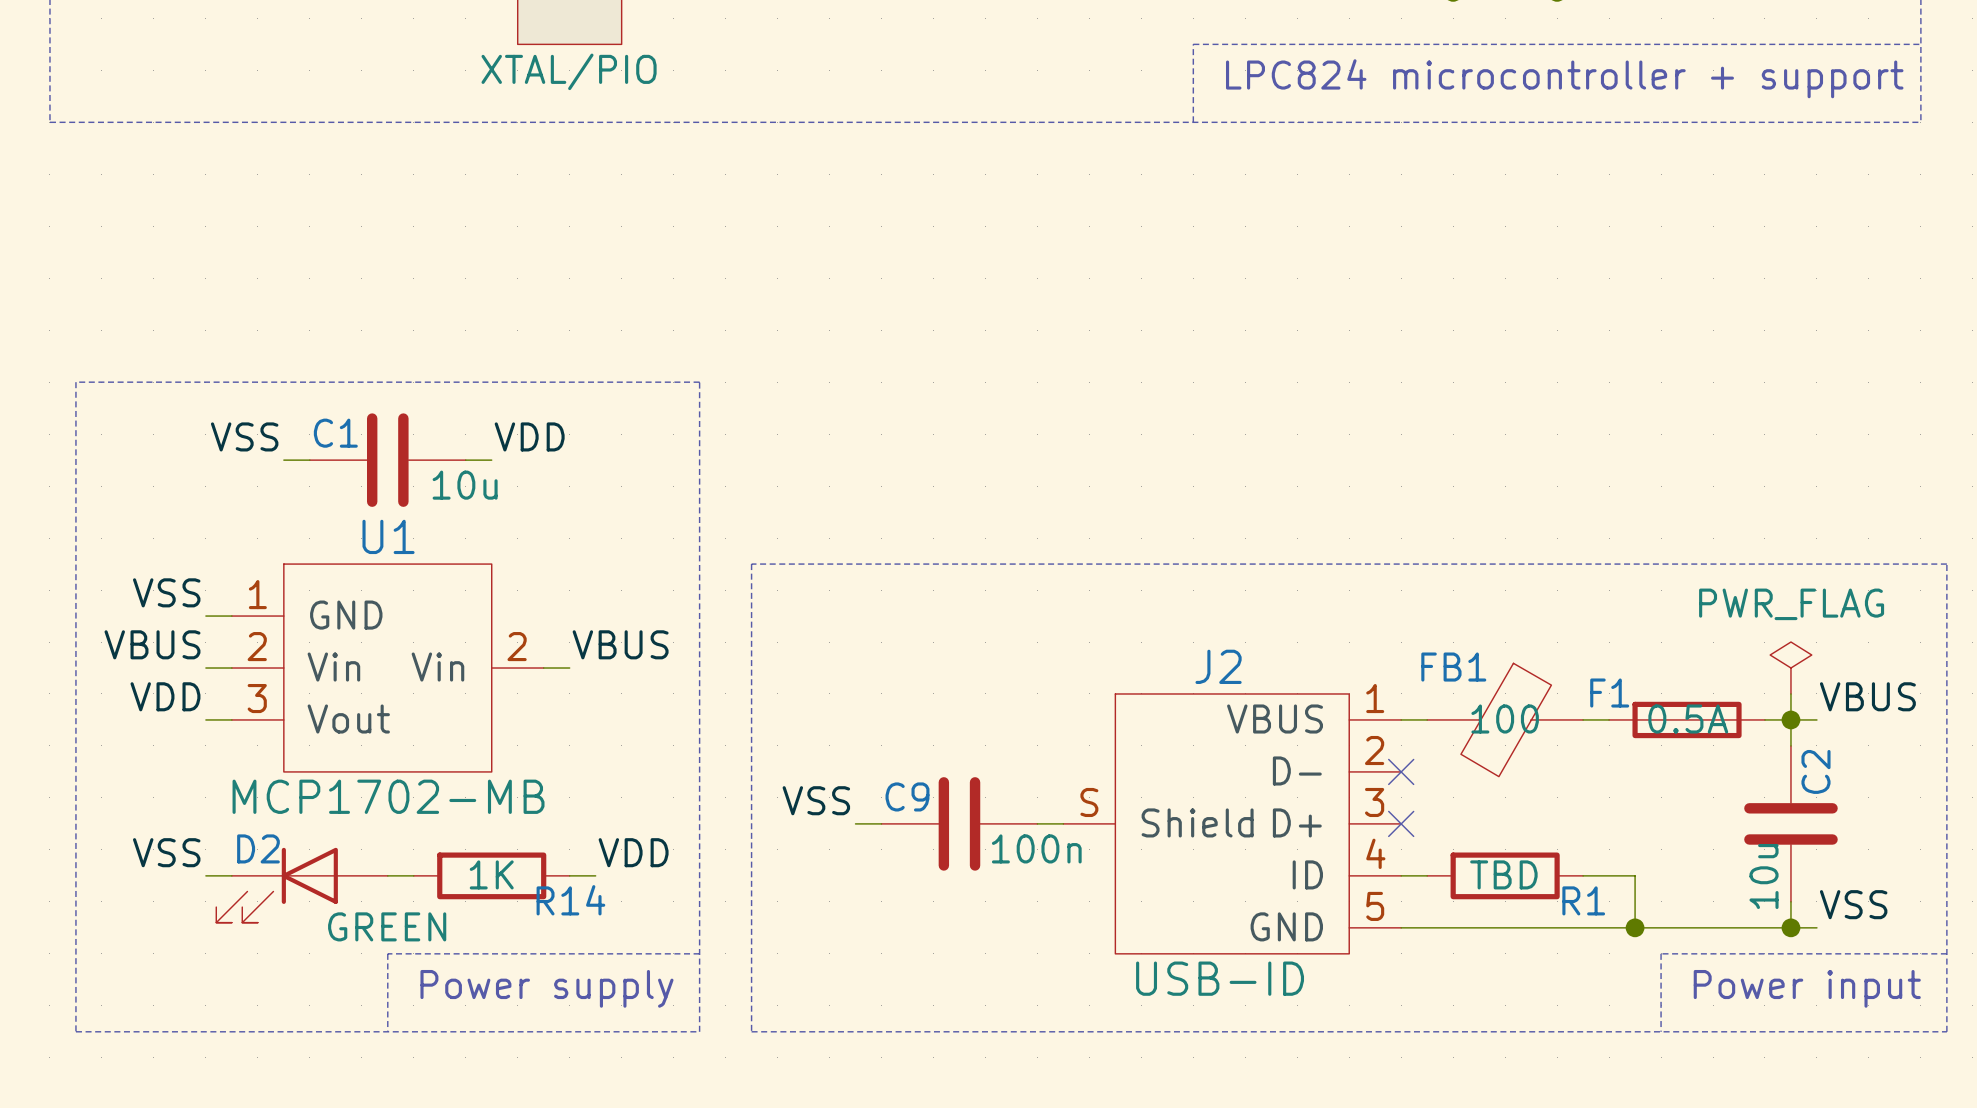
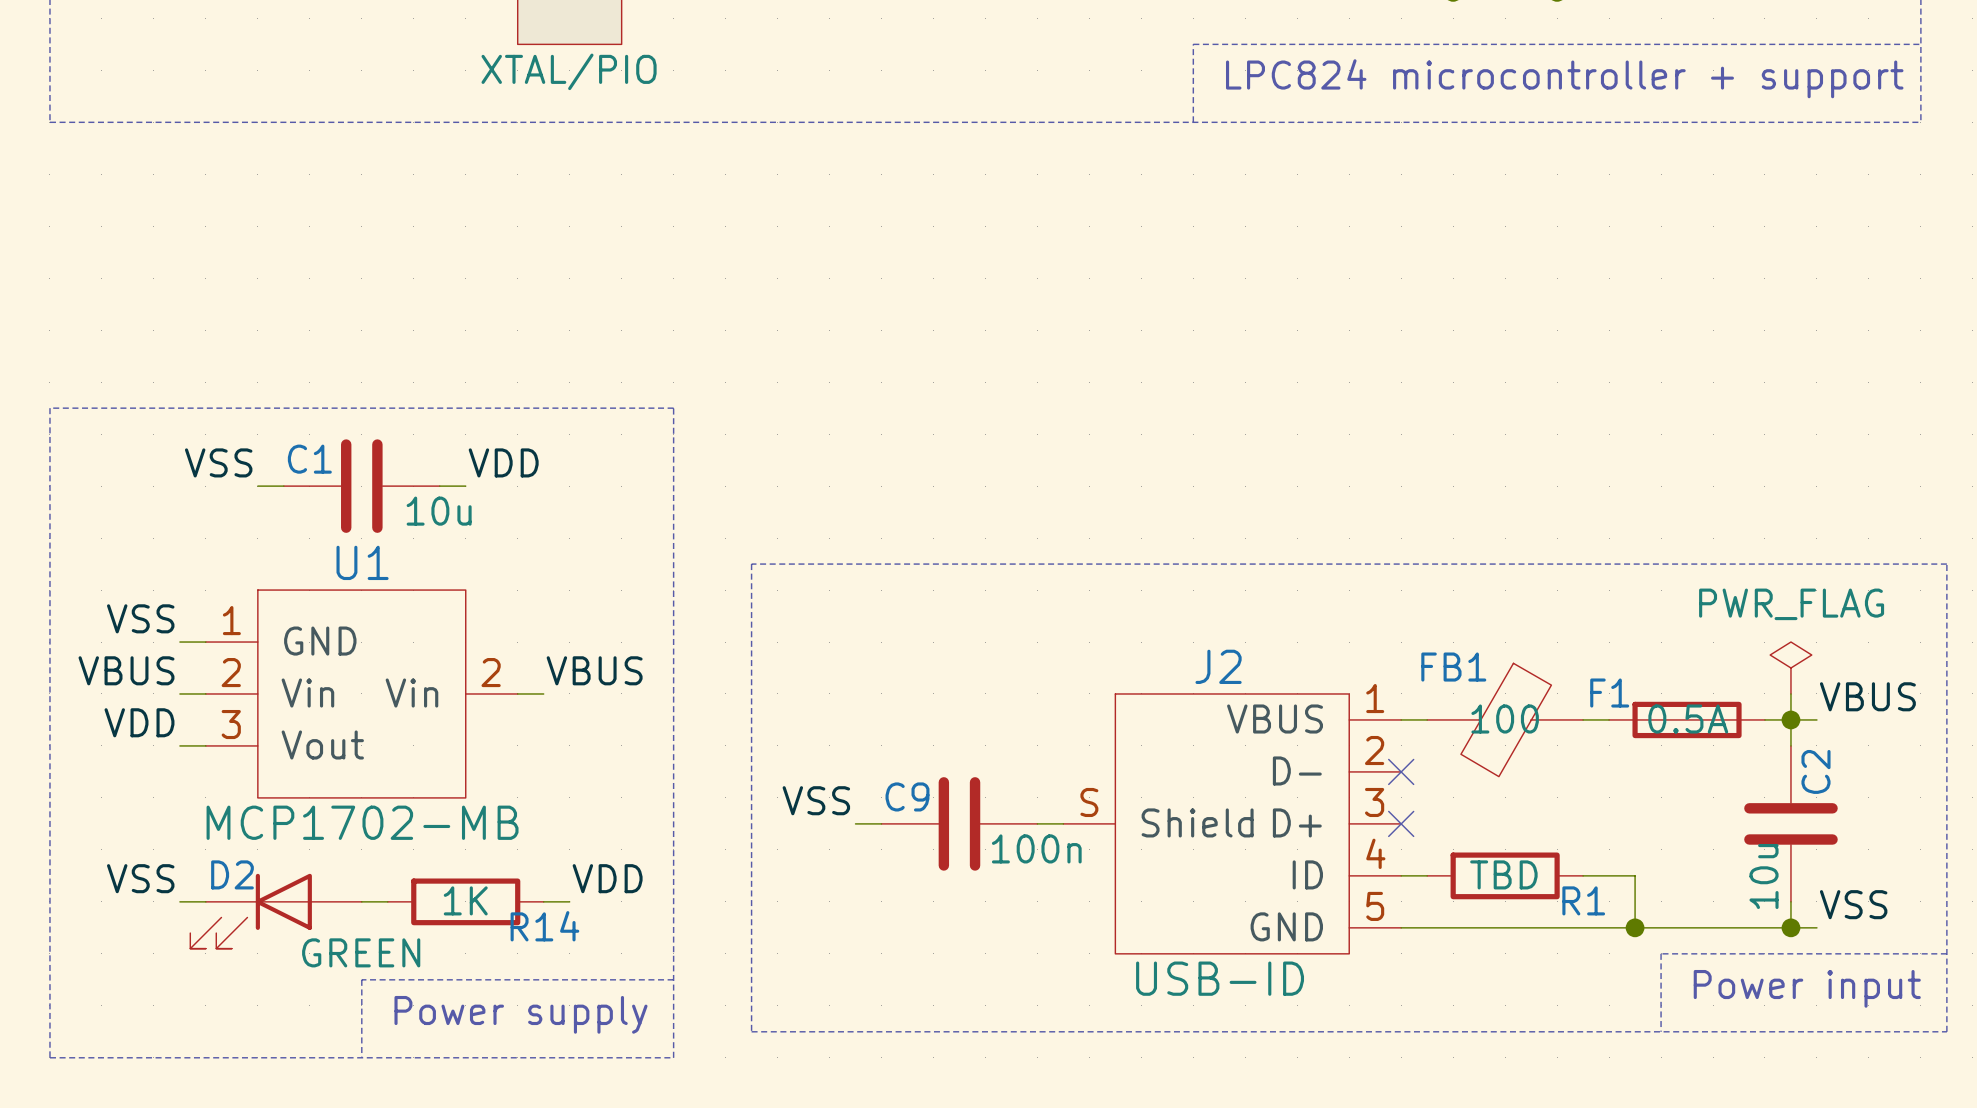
line: (75, 382) (699, 382) (699, 1031) (75, 1031) (75, 382) -> (49, 408) (673, 408) (673, 1057) (49, 1057) (49, 408)
label position: VSS (244, 436) -> VSS (218, 462)
label position: VDD (529, 436) -> VDD (503, 462)
wire: (283, 460) (309, 460) -> (257, 486) (283, 486)
C1 position: (387, 460) -> (361, 486)
wire: (465, 460) (491, 460) -> (439, 486) (465, 486)
label position: VSS (166, 592) -> VSS (140, 618)
wire: (205, 616) (231, 616) -> (179, 642) (205, 642)
label position: VBUS (152, 644) -> VBUS (126, 670)
label position: VBUS (620, 644) -> VBUS (594, 670)
wire: (205, 668) (231, 668) -> (179, 693) (205, 693)
U1 position: (387, 668) -> (361, 693)
wire: (543, 668) (569, 668) -> (517, 693) (543, 693)
label position: VDD (165, 696) -> VDD (139, 722)
wire: (205, 719) (231, 719) -> (179, 745) (205, 745)
label position: VSS (166, 852) -> VSS (140, 878)
label position: VDD (633, 852) -> VDD (607, 878)
wire: (205, 875) (231, 875) -> (179, 901) (205, 901)
wire: (387, 875) (413, 875) -> (361, 901) (387, 901)
R14 position: (491, 875) -> (465, 901)
wire: (569, 875) (595, 875) -> (543, 901) (569, 901)
D2 position: (302, 885) -> (276, 911)
line: (699, 953) (387, 953) (387, 1031) -> (673, 979) (361, 979) (361, 1057)
text position: Power supply (546, 988) -> Power supply (521, 1014)

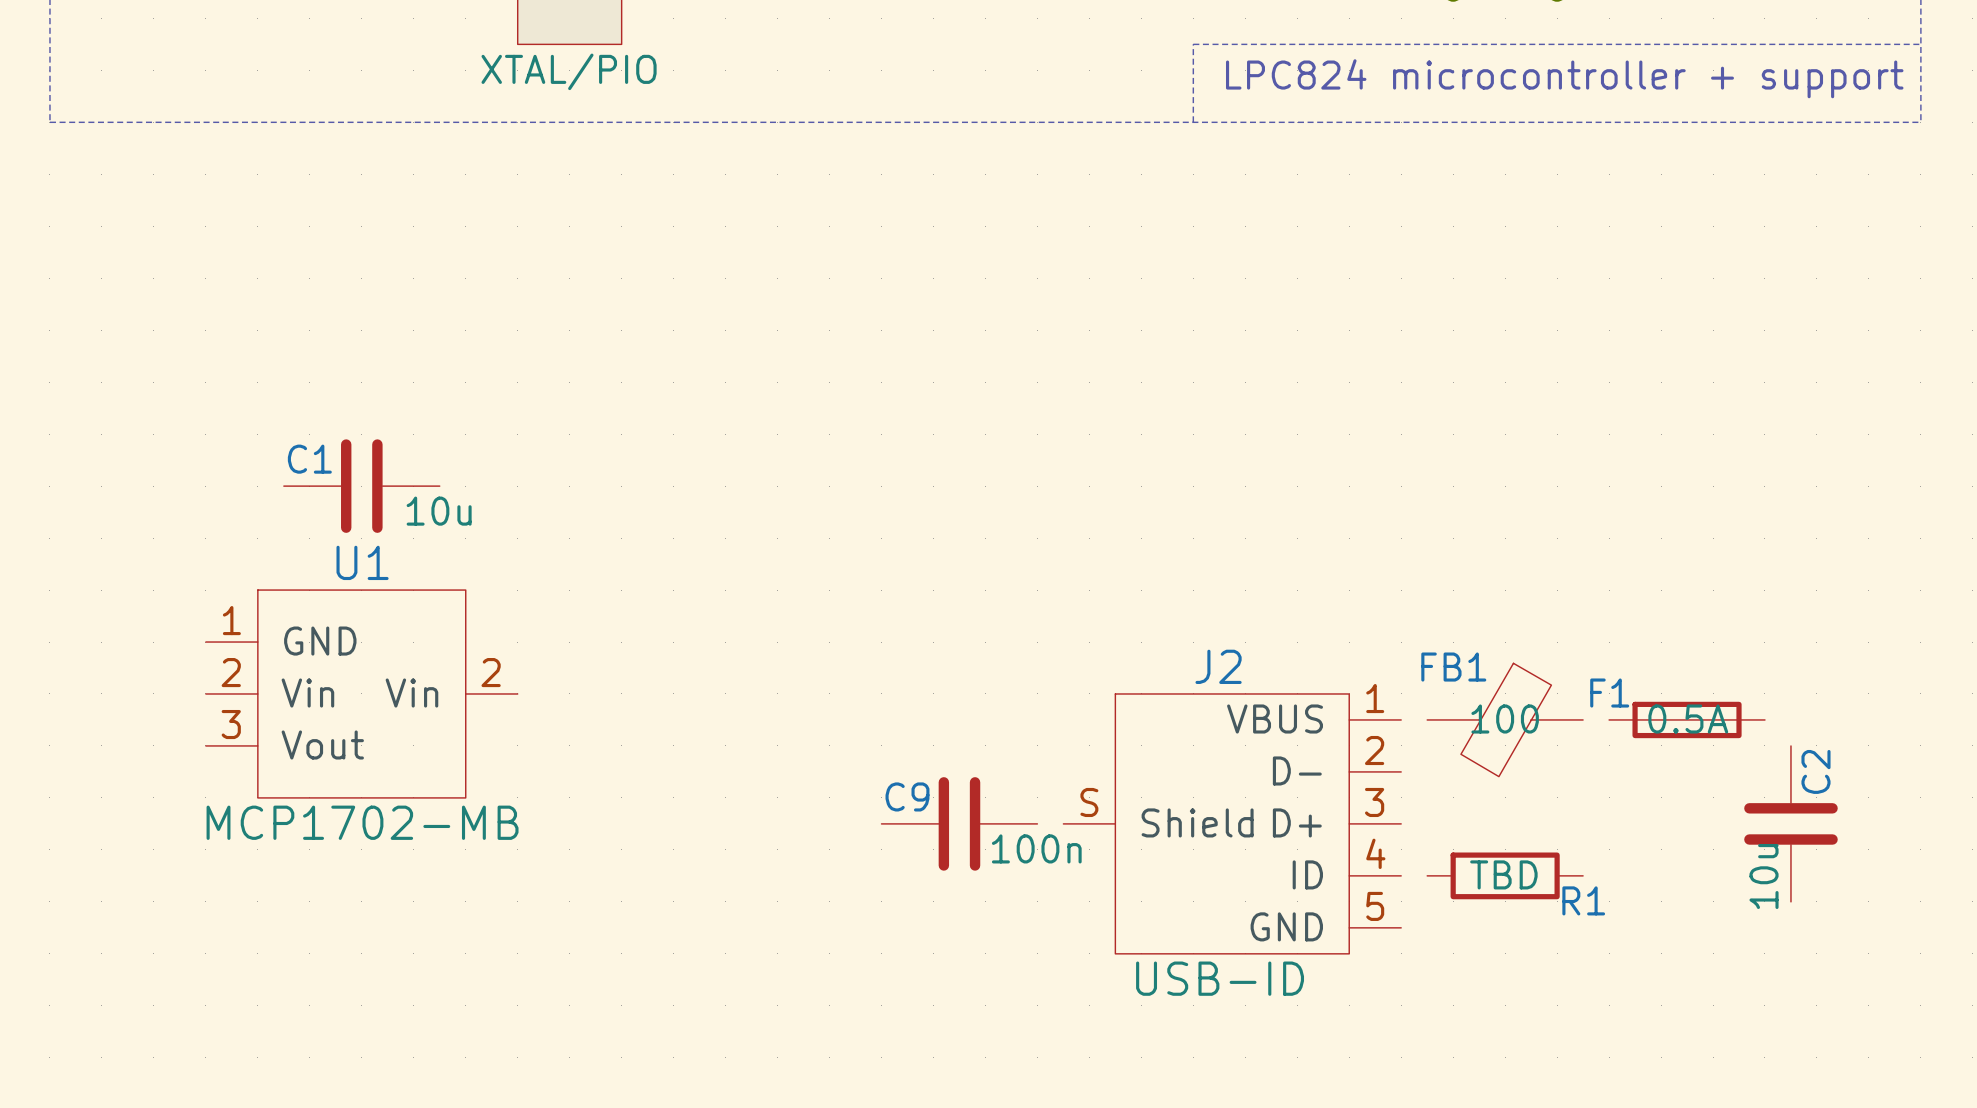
line: (49, 408) (673, 408) (673, 1057) (49, 1057) (49, 408) -> none
label: VSS (218, 462) -> none
label: VDD (503, 462) -> none
wire: (257, 486) (283, 486) -> none
wire: (439, 486) (465, 486) -> none
line: (751, 564) (1946, 564) (1946, 1031) (751, 1031) (751, 564) -> none
label: VSS (140, 618) -> none
wire: (179, 642) (205, 642) -> none
power symbol: PWR_FLAG (1790, 668) -> none
label: VBUS (126, 670) -> none
label: VBUS (594, 670) -> none
wire: (179, 693) (205, 693) -> none
wire: (517, 693) (543, 693) -> none
wire: (1790, 693) (1790, 745) -> none
label: VBUS (1867, 696) -> none
wire: (1401, 719) (1427, 719) -> none
wire: (1583, 719) (1609, 719) -> none
wire: (1764, 719) (1816, 719) -> none
junction: (1790, 719) -> none
label: VDD (139, 722) -> none
wire: (179, 745) (205, 745) -> none
no-connect mark: (1401, 771) -> none
label: VSS (816, 800) -> none
wire: (855, 823) (881, 823) -> none
wire: (1037, 823) (1063, 823) -> none
no-connect mark: (1401, 823) -> none
wire: (1401, 875) (1427, 875) -> none
wire: (1583, 875) (1635, 875) (1635, 927) -> none
label: VSS (140, 878) -> none
label: VDD (607, 878) -> none
wire: (179, 901) (205, 901) -> none
wire: (361, 901) (387, 901) -> none
R14: 1K (465, 901) -> none
wire: (543, 901) (569, 901) -> none
wire: (1790, 901) (1790, 927) -> none
label: VSS (1853, 904) -> none
D2: GREEN (276, 911) -> none
wire: (1401, 927) (1816, 927) -> none
junction: (1635, 927) -> none
junction: (1790, 927) -> none
line: (1946, 953) (1661, 953) (1661, 1031) -> none
line: (673, 979) (361, 979) (361, 1057) -> none
text: Power input (1807, 988) -> none
text: Power supply (521, 1014) -> none

